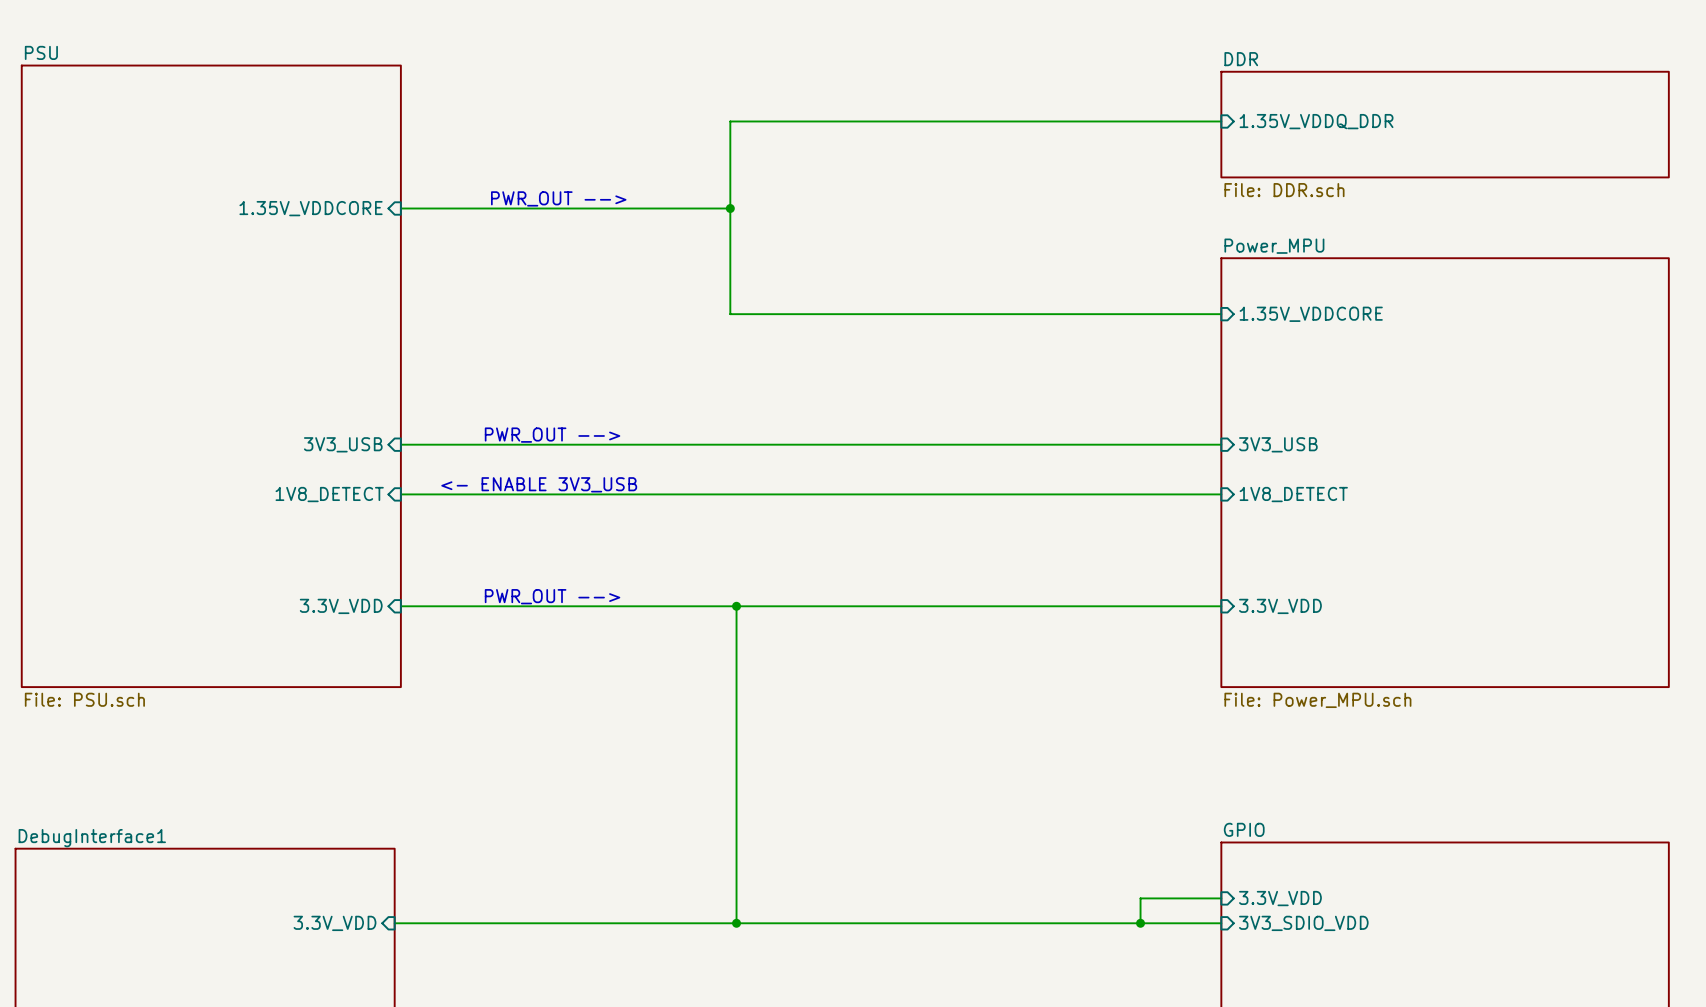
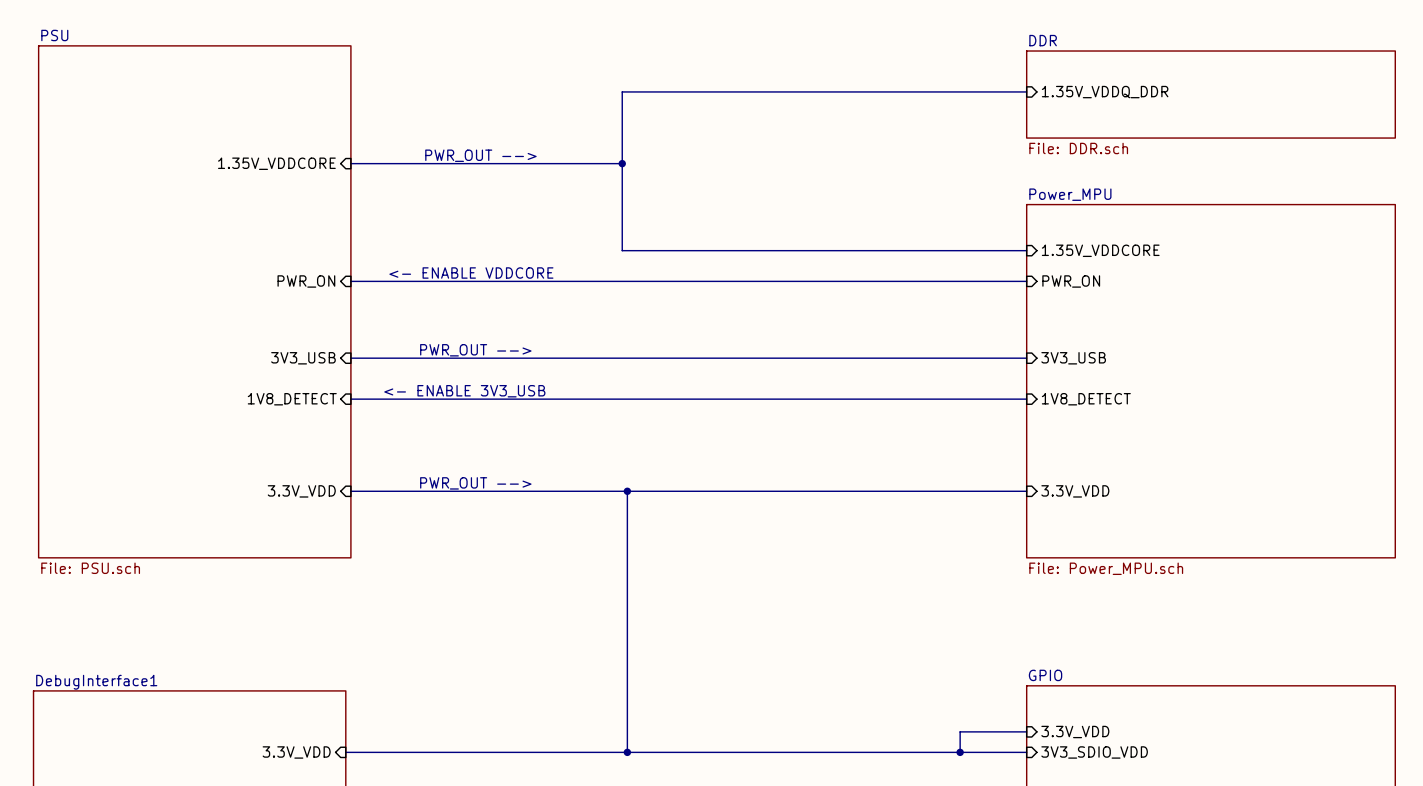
text: none -> <- ENABLE VDDCORE (471, 272)
sheet pin: none -> PWR_ON (306, 281)
wire: none -> (350, 281) (1026, 281)
sheet pin: none -> PWR_ON (1071, 281)

